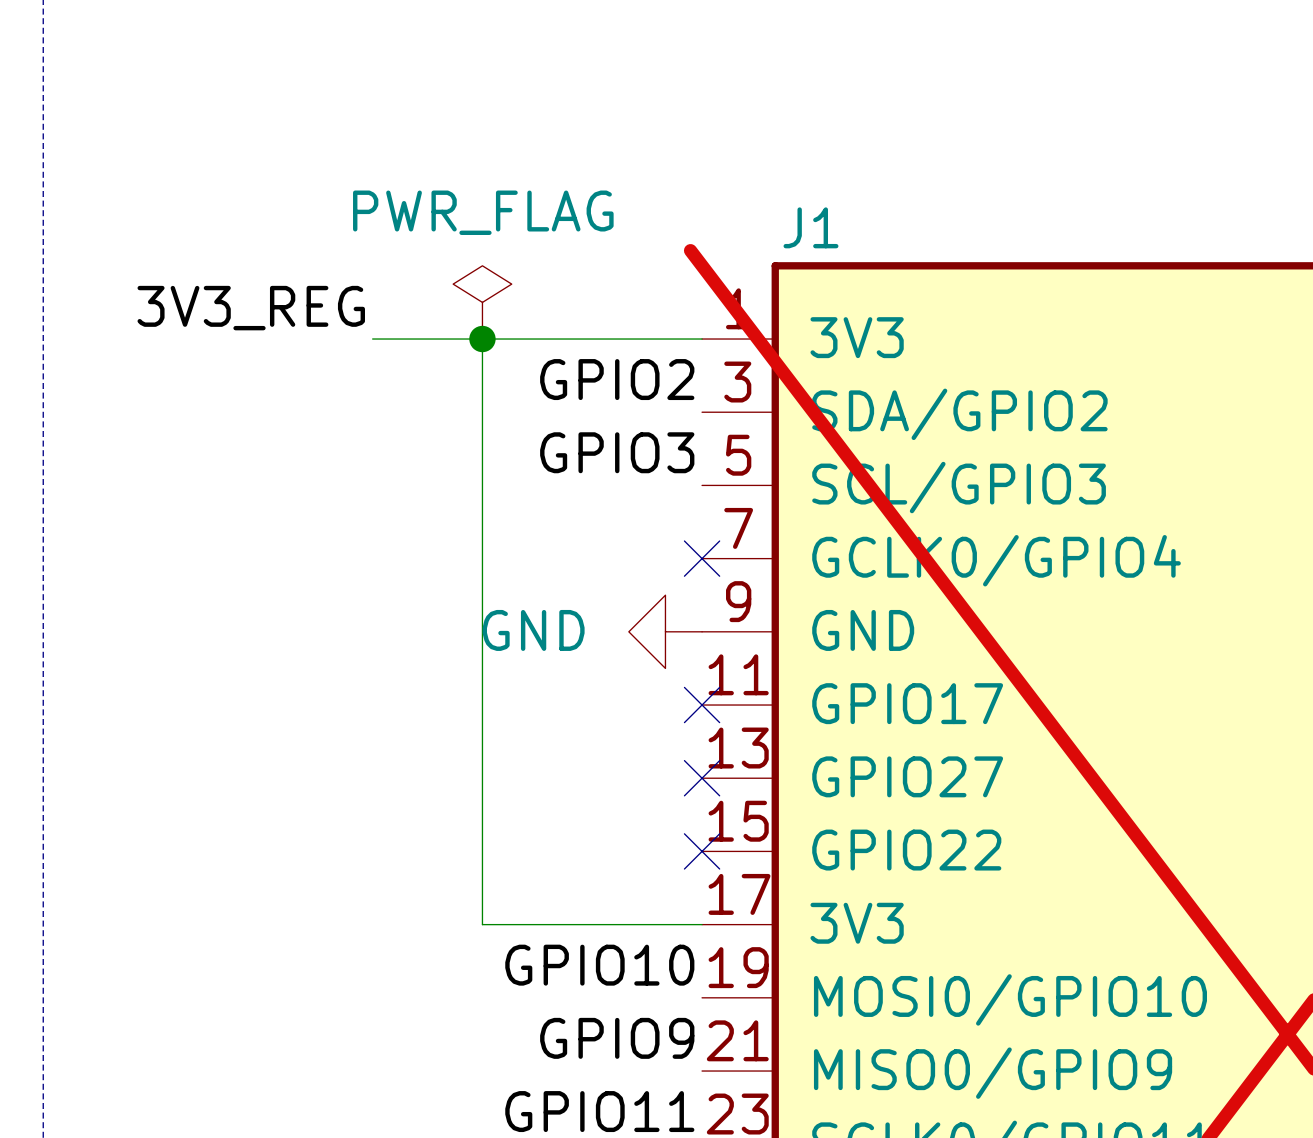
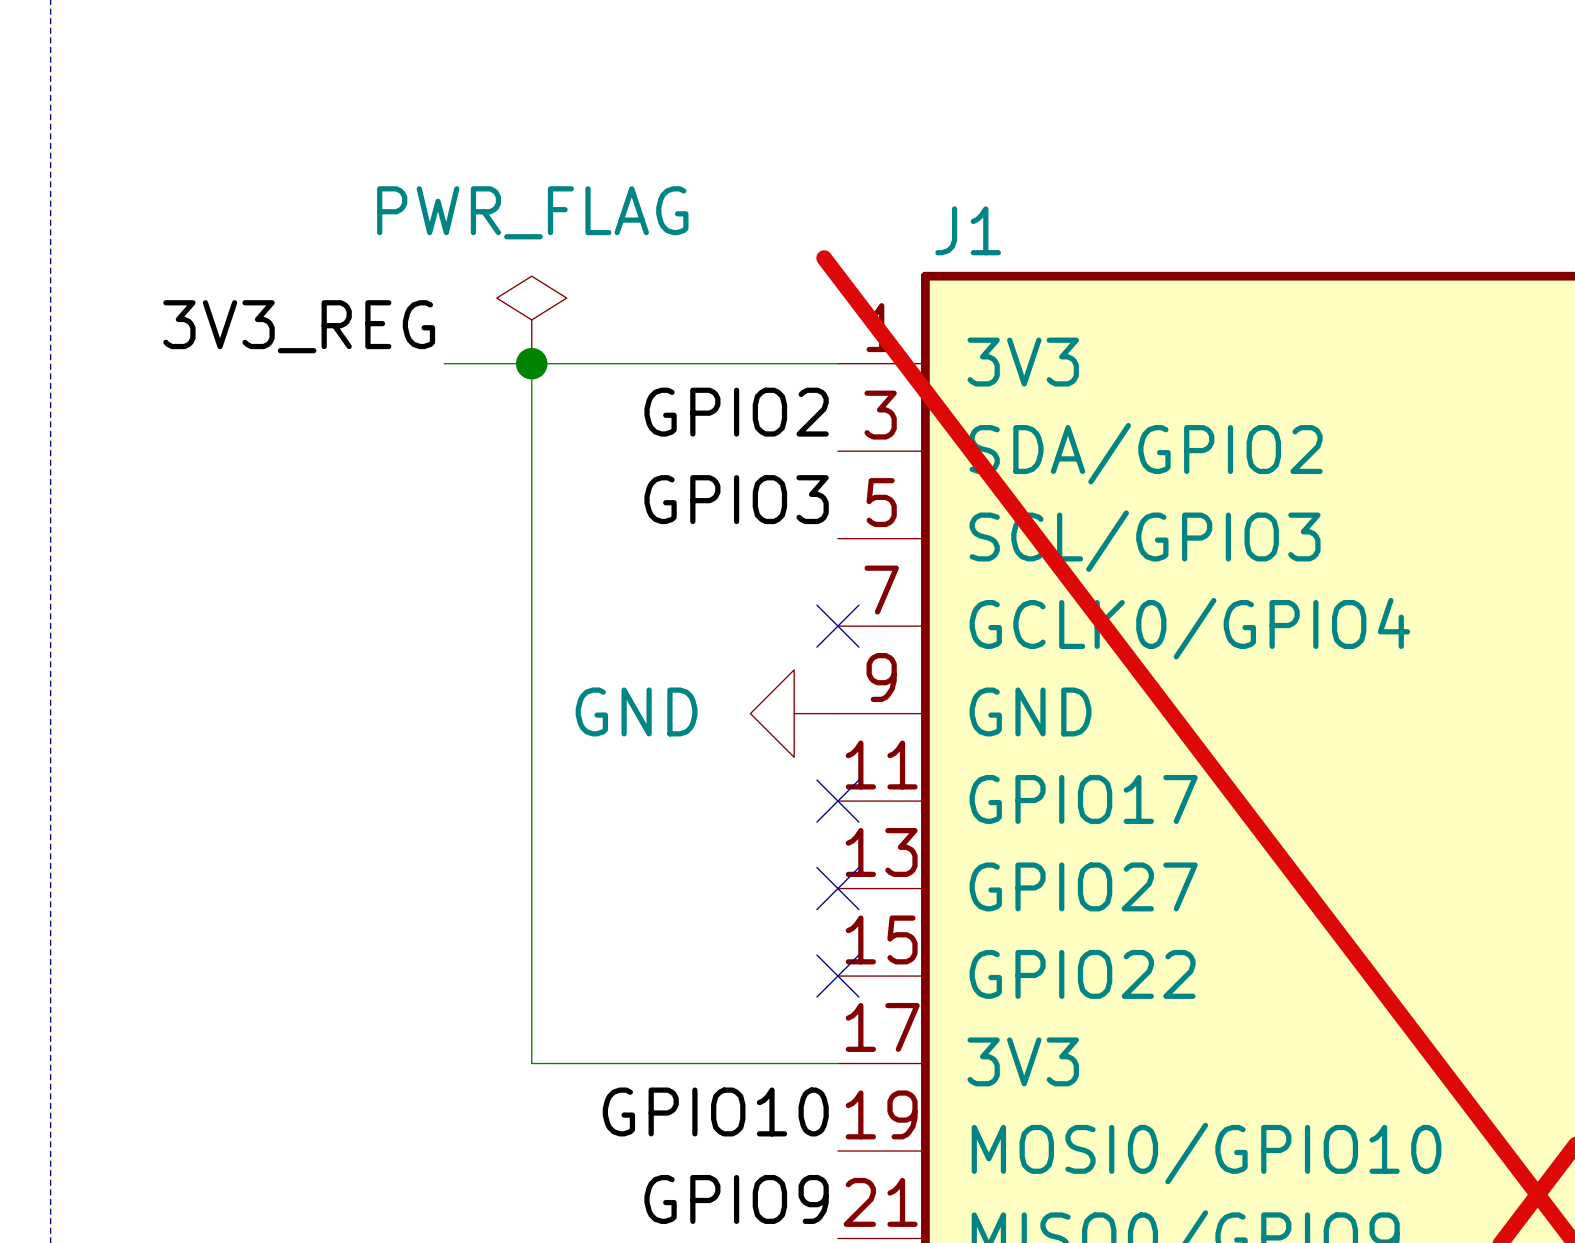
power symbol position: PWR_FLAG (482, 302) -> PWR_FLAG (531, 319)
wire: (482, 339) (482, 924) -> (531, 363) (531, 1063) (575, 1063)
junction position: (482, 339) -> (531, 363)

